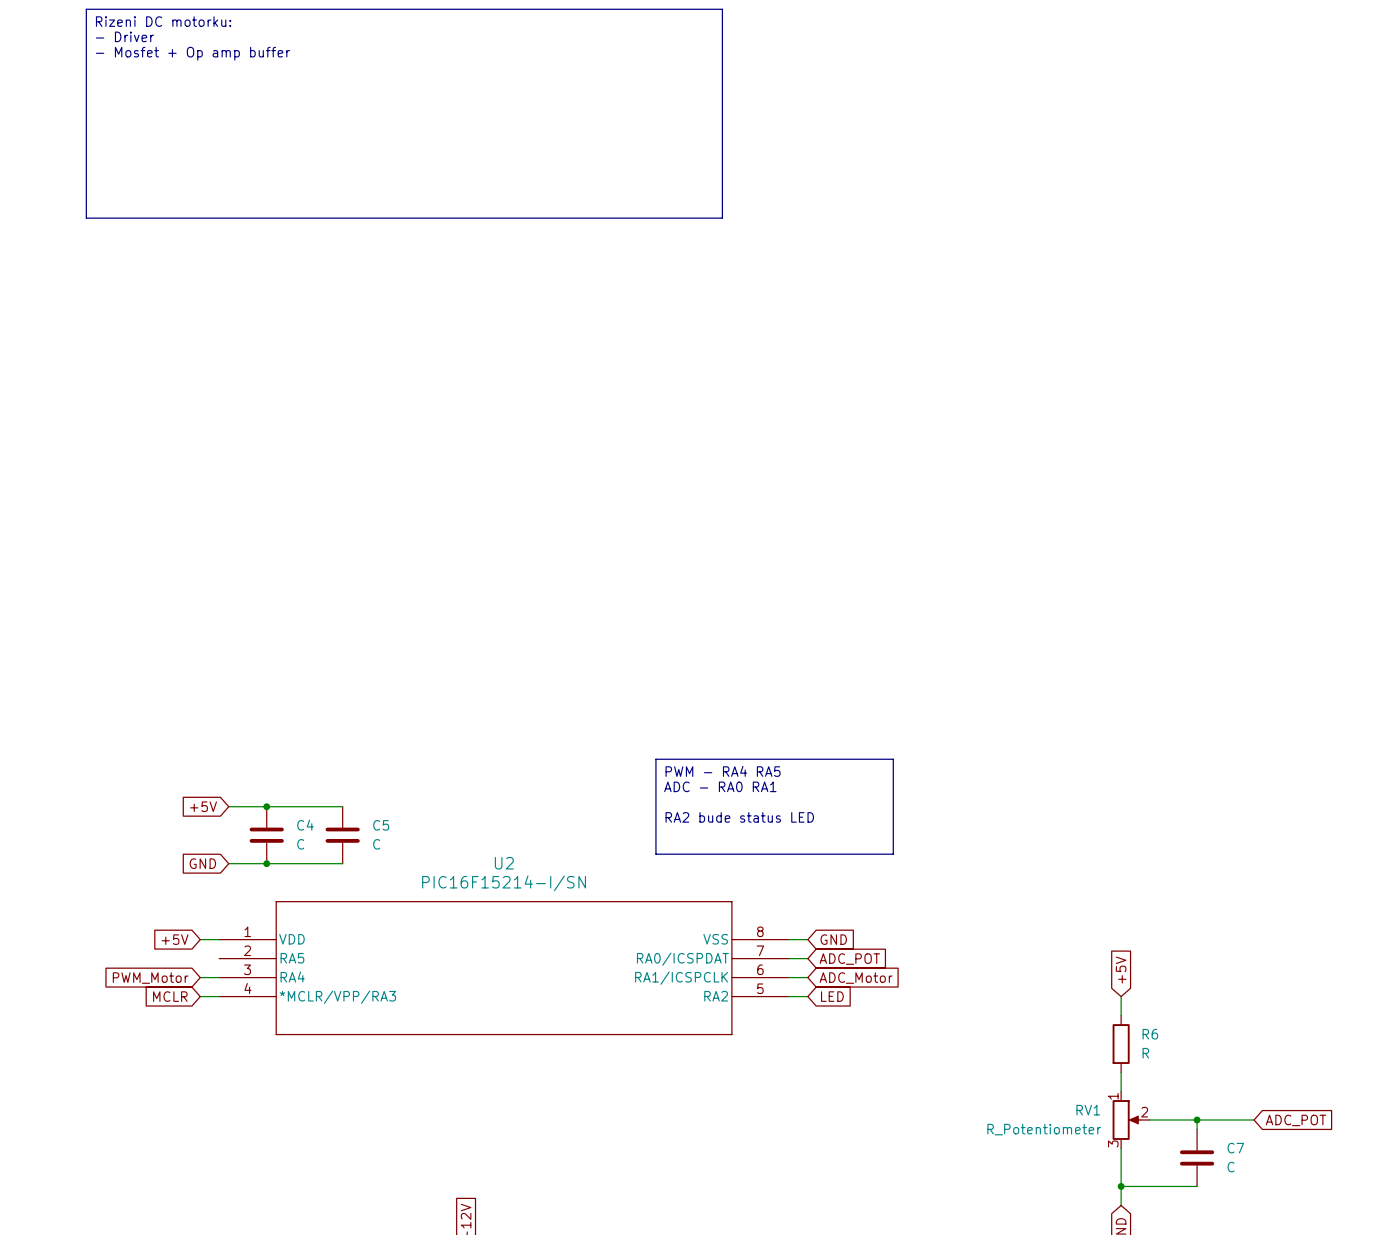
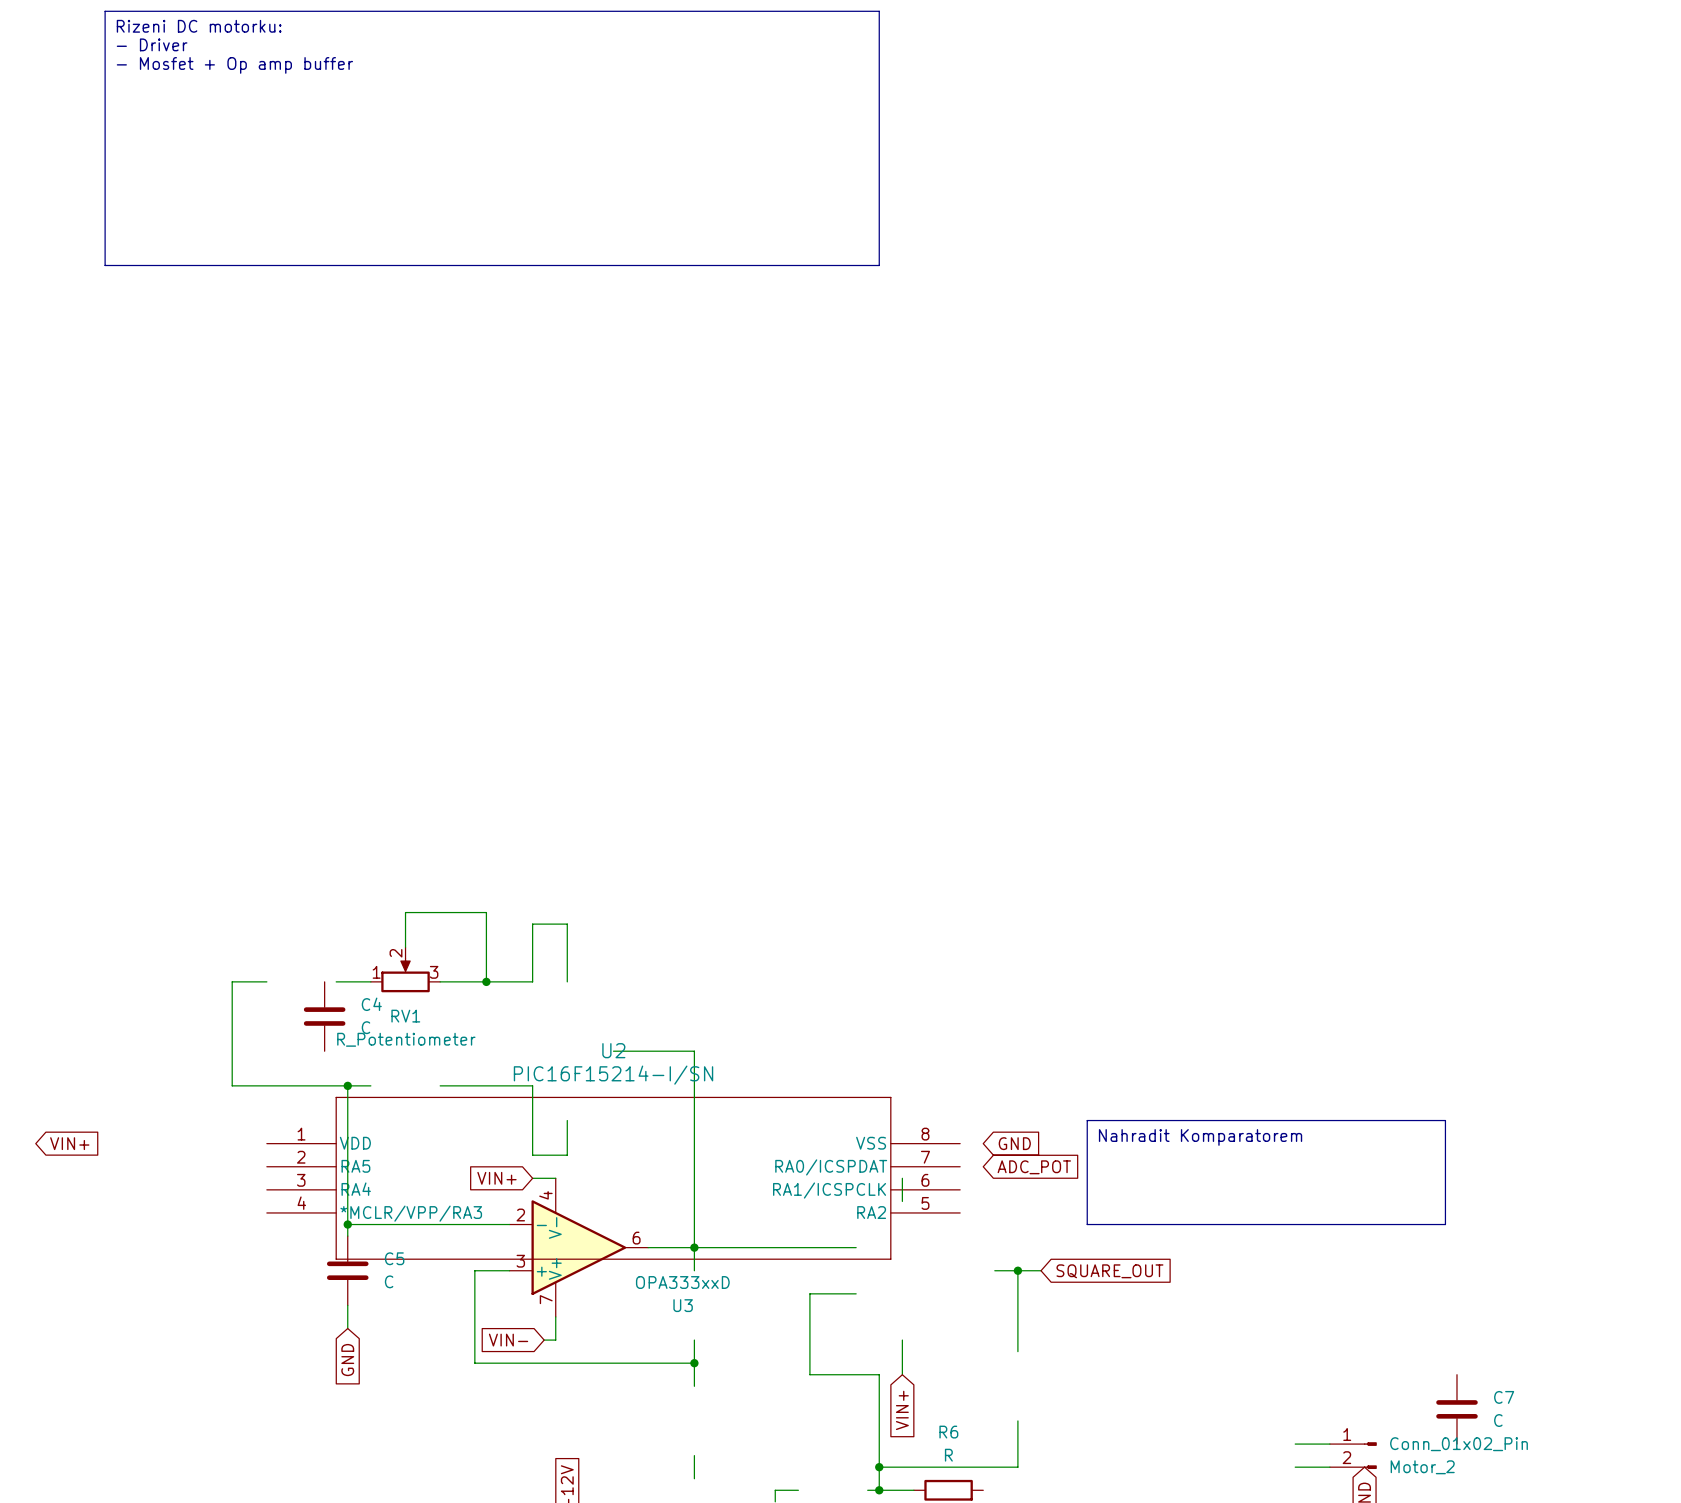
line: (655, 759) (893, 759) (893, 854) (655, 854) (655, 759) -> none
text: PWM - RA4 RA5 (723, 771) -> none
wire: none -> (405, 947) (405, 912) (486, 912) (486, 981)
text: ADC - RA0 RA1 (720, 786) -> none
global label: +5V (203, 806) -> none
wire: none -> (266, 981) (232, 981) (232, 1085) (370, 1085)
wire: (228, 806) (276, 806) -> none
junction: (266, 806) -> none
wire: (304, 806) (342, 806) -> none
wire: none -> (440, 981) (532, 981) (532, 924) (567, 924) (567, 981)
junction: none -> (486, 981)
text: RA2 bude status LED (739, 817) -> none
C5 position: (342, 835) -> (347, 1270)
global label: GND (202, 863) -> none
wire: (228, 863) (342, 863) -> none
junction position: (266, 863) -> (347, 1085)
wire: none -> (613, 1051) (694, 1051) (694, 1270)
wire: none -> (347, 1085) (347, 1236)
wire: none -> (440, 1085) (532, 1085) (532, 1155) (567, 1155) (567, 1120)
line: none -> (1087, 1120) (1445, 1120) (1445, 1224) (1087, 1224) (1087, 1120)
text: none -> Nahradit Komparatorem (1200, 1137)
global label: none -> VIN+ (69, 1143)
global label: +5V (175, 939) -> none
wire: (200, 939) (219, 939) -> none
wire: (788, 939) (807, 939) -> none
wire: (788, 958) (807, 958) -> none
global label: none -> VIN+ (496, 1178)
wire: none -> (532, 1178) (555, 1178)
wire: none -> (902, 1178) (902, 1201)
global label: +5V (1121, 970) -> none
wire: (200, 977) (219, 977) -> none
wire: (788, 977) (807, 977) -> none
global label: PWM_Motor (150, 978) -> none
global label: ADC_Motor (856, 978) -> none
global label: MCLR (170, 996) -> none
wire: (200, 996) (219, 996) -> none
wire: (788, 996) (807, 996) -> none
global label: LED (832, 996) -> none
wire: (1121, 996) (1121, 1015) -> none
wire: none -> (347, 1224) (509, 1224)
junction: none -> (347, 1224)
U3: none -> OPA333xxD (578, 1247)
wire: none -> (648, 1247) (856, 1247)
junction: none -> (694, 1247)
R6 name position: R6 (1150, 1034) -> R6 (948, 1432)
wire: none -> (509, 1270) (474, 1270) (474, 1363) (694, 1363)
wire: none -> (994, 1270) (1041, 1270)
wire: none -> (1017, 1270) (1017, 1351)
junction: none -> (1017, 1270)
global label: none -> SQUARE_OUT (1109, 1271)
R6 rotation: 0° (1121, 1044) -> 90° clockwise (948, 1490)
R6 position: (1121, 1044) -> (948, 1490)
R6 value position: R (1145, 1053) -> R (948, 1455)
wire: none -> (856, 1293) (809, 1293) (809, 1374) (879, 1374) (879, 1490)
wire: none -> (347, 1305) (347, 1328)
wire: (1121, 1072) (1121, 1091) -> none
wire: none -> (555, 1316) (555, 1340) (544, 1340)
global label: none -> VIN- (508, 1340)
wire: none -> (694, 1340) (694, 1386)
wire: none -> (902, 1340) (902, 1374)
global label: none -> GND (347, 1360)
junction: none -> (694, 1363)
RV1 rotation: 0° (1126, 1120) -> 90° counterclockwise (405, 975)
RV1 position: (1131, 1120) -> (405, 969)
wire: (1149, 1120) (1254, 1120) -> none
wire: (1197, 1120) (1197, 1129) -> none
junction: (1197, 1120) -> none
global label: ADC_POT (1295, 1120) -> none
RV1 value position: R_Potentiometer (1044, 1129) -> R_Potentiometer (406, 1039)
wire: (1121, 1148) (1121, 1205) -> none
global label: none -> VIN+ (902, 1410)
wire: none -> (1017, 1420) (1017, 1467) (879, 1467)
wire: none -> (1295, 1444) (1329, 1444)
wire: (1121, 1186) (1197, 1186) -> none
junction: (1121, 1186) -> none
wire: none -> (694, 1455) (694, 1478)
Motor_2: none -> Conn_01x02_Pin (1353, 1455)
junction: none -> (879, 1467)
wire: none -> (1295, 1467) (1329, 1467)
wire: none -> (798, 1490) (775, 1490) (775, 1501)
wire: none -> (867, 1490) (913, 1490)
junction: none -> (879, 1490)

